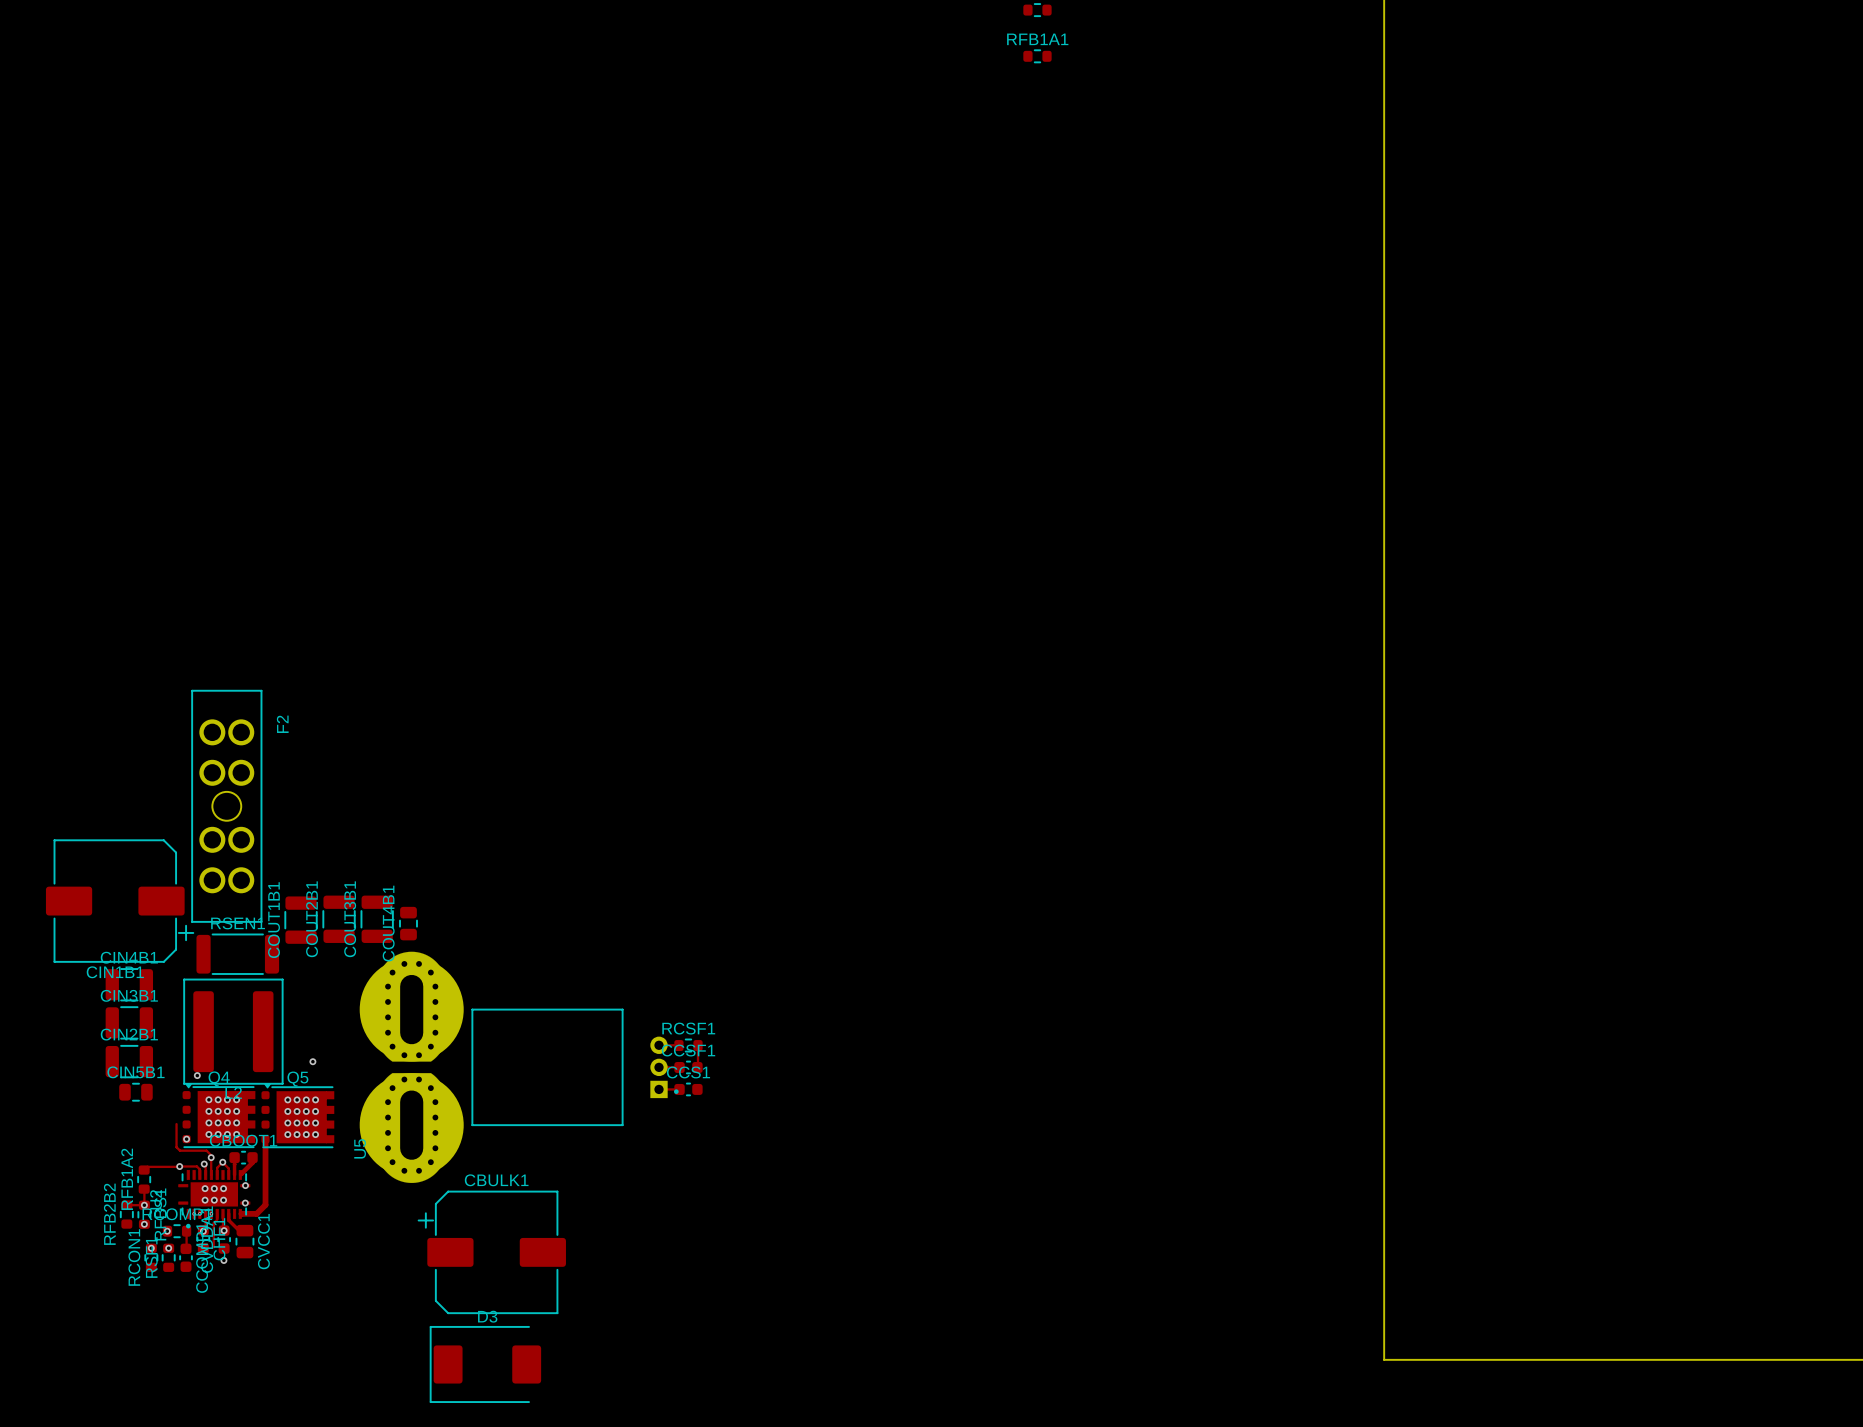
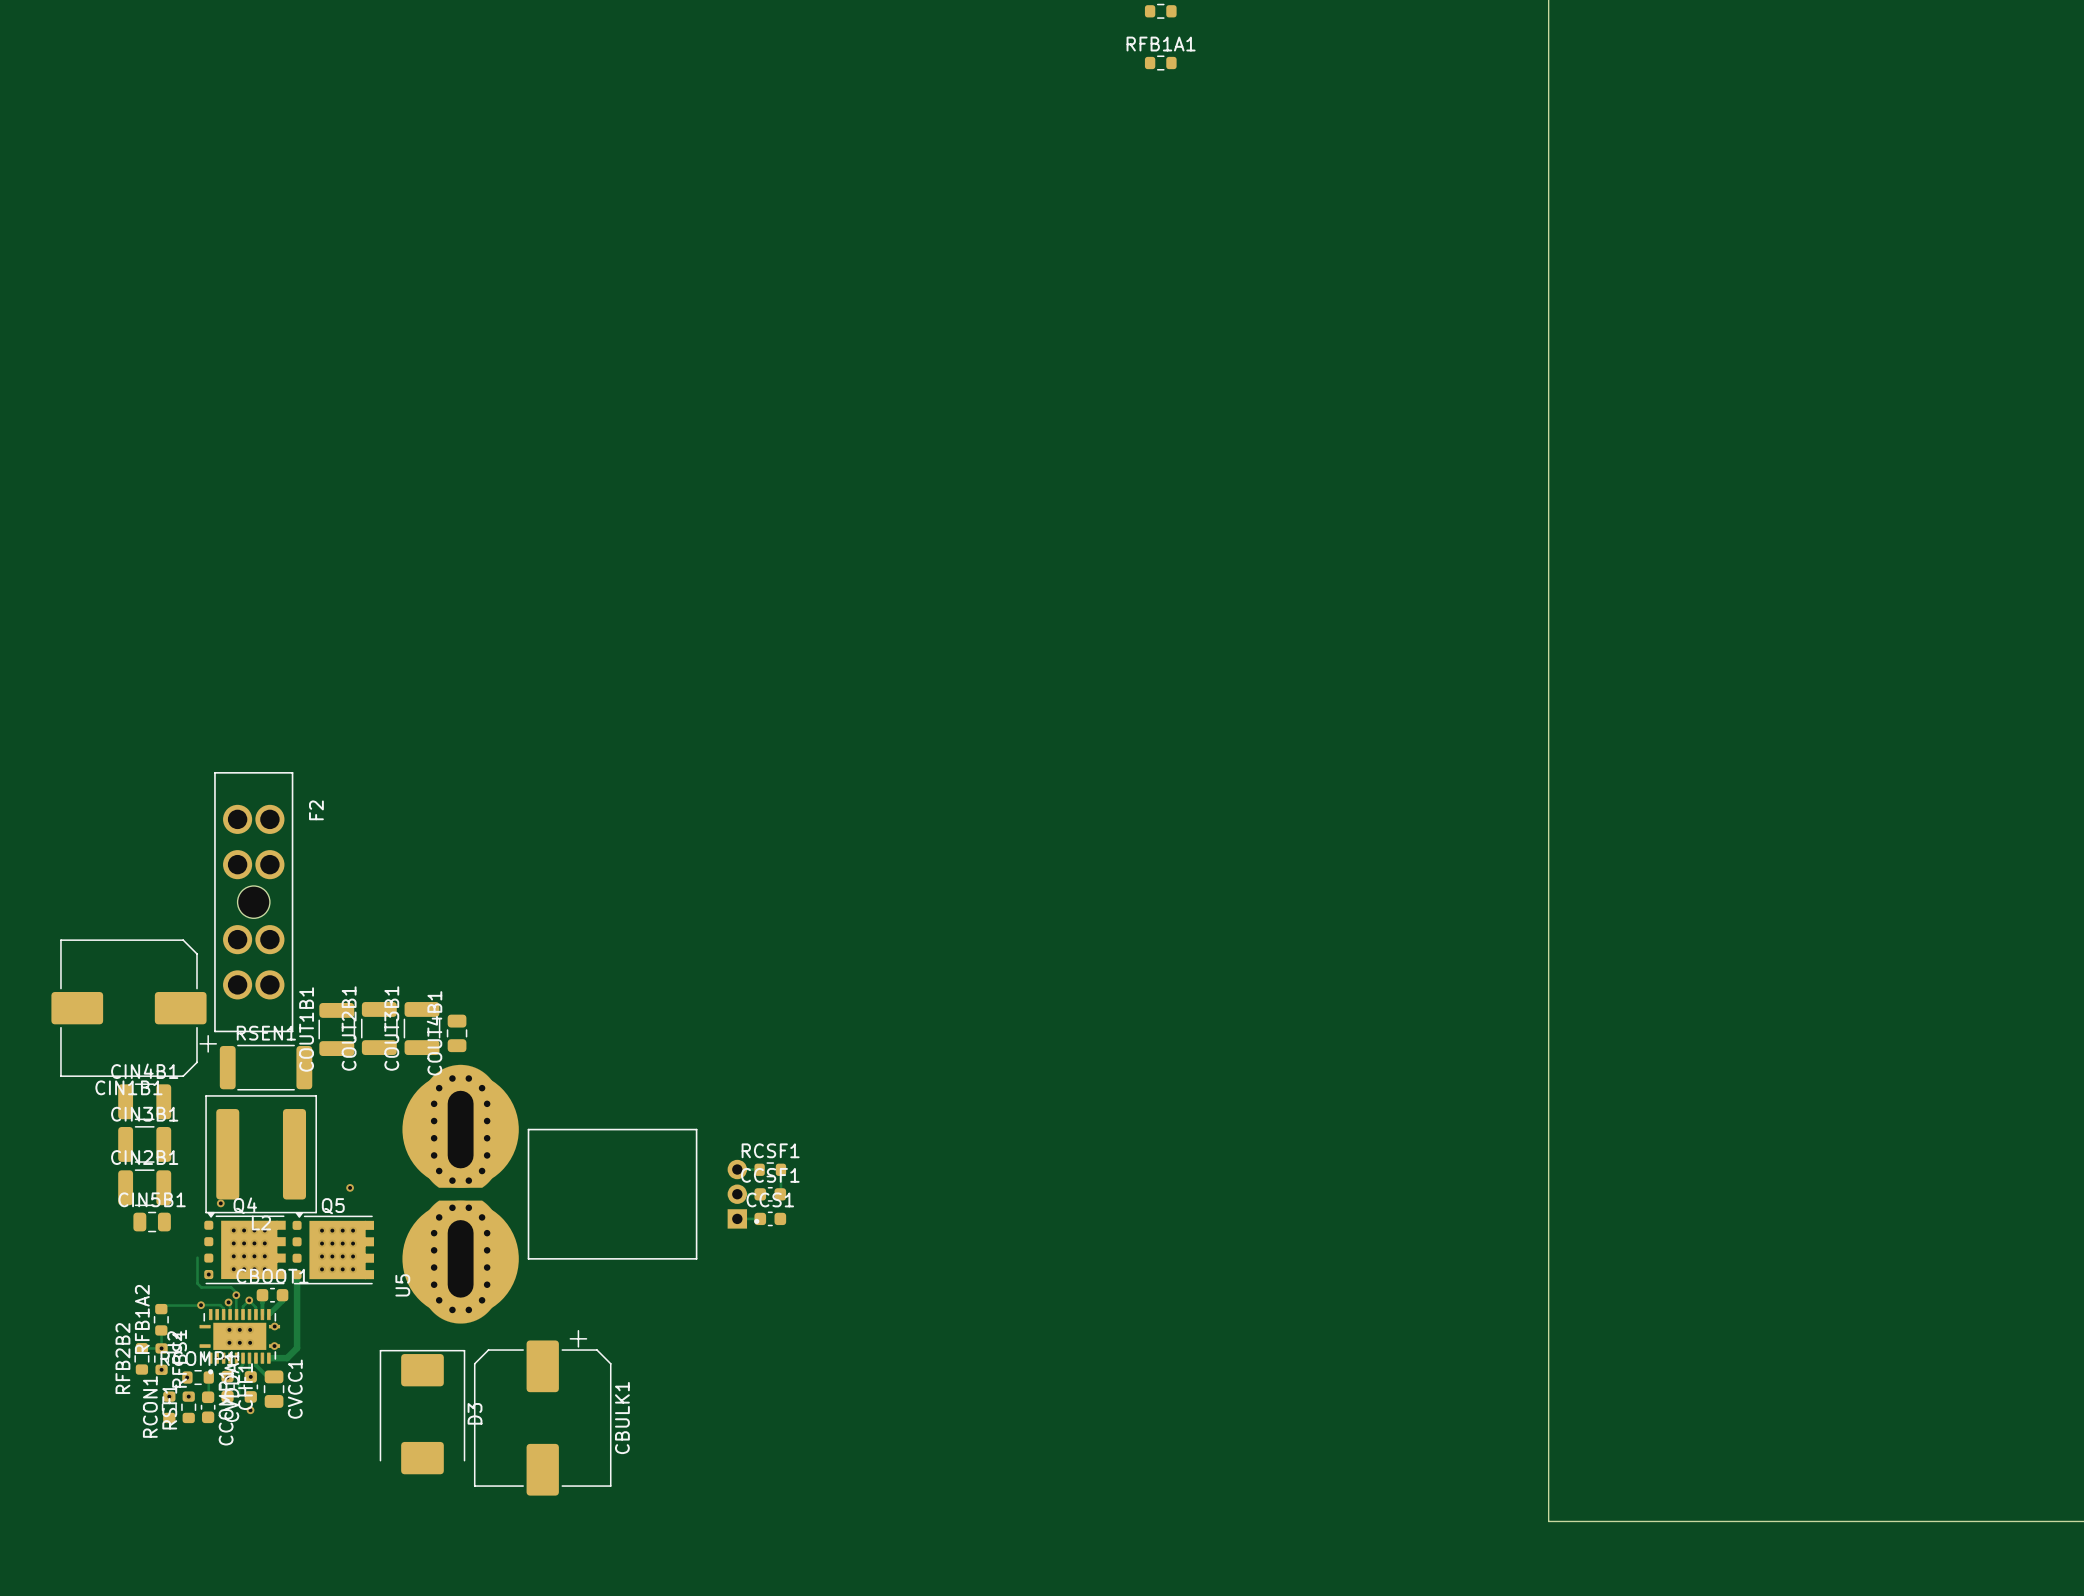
CBULK1 rotation: 0° (491, 1252) -> 90° clockwise (542, 1412)
D3 rotation: 0° (485, 1364) -> 90° clockwise (422, 1412)
D3 position: (485, 1364) -> (422, 1412)

